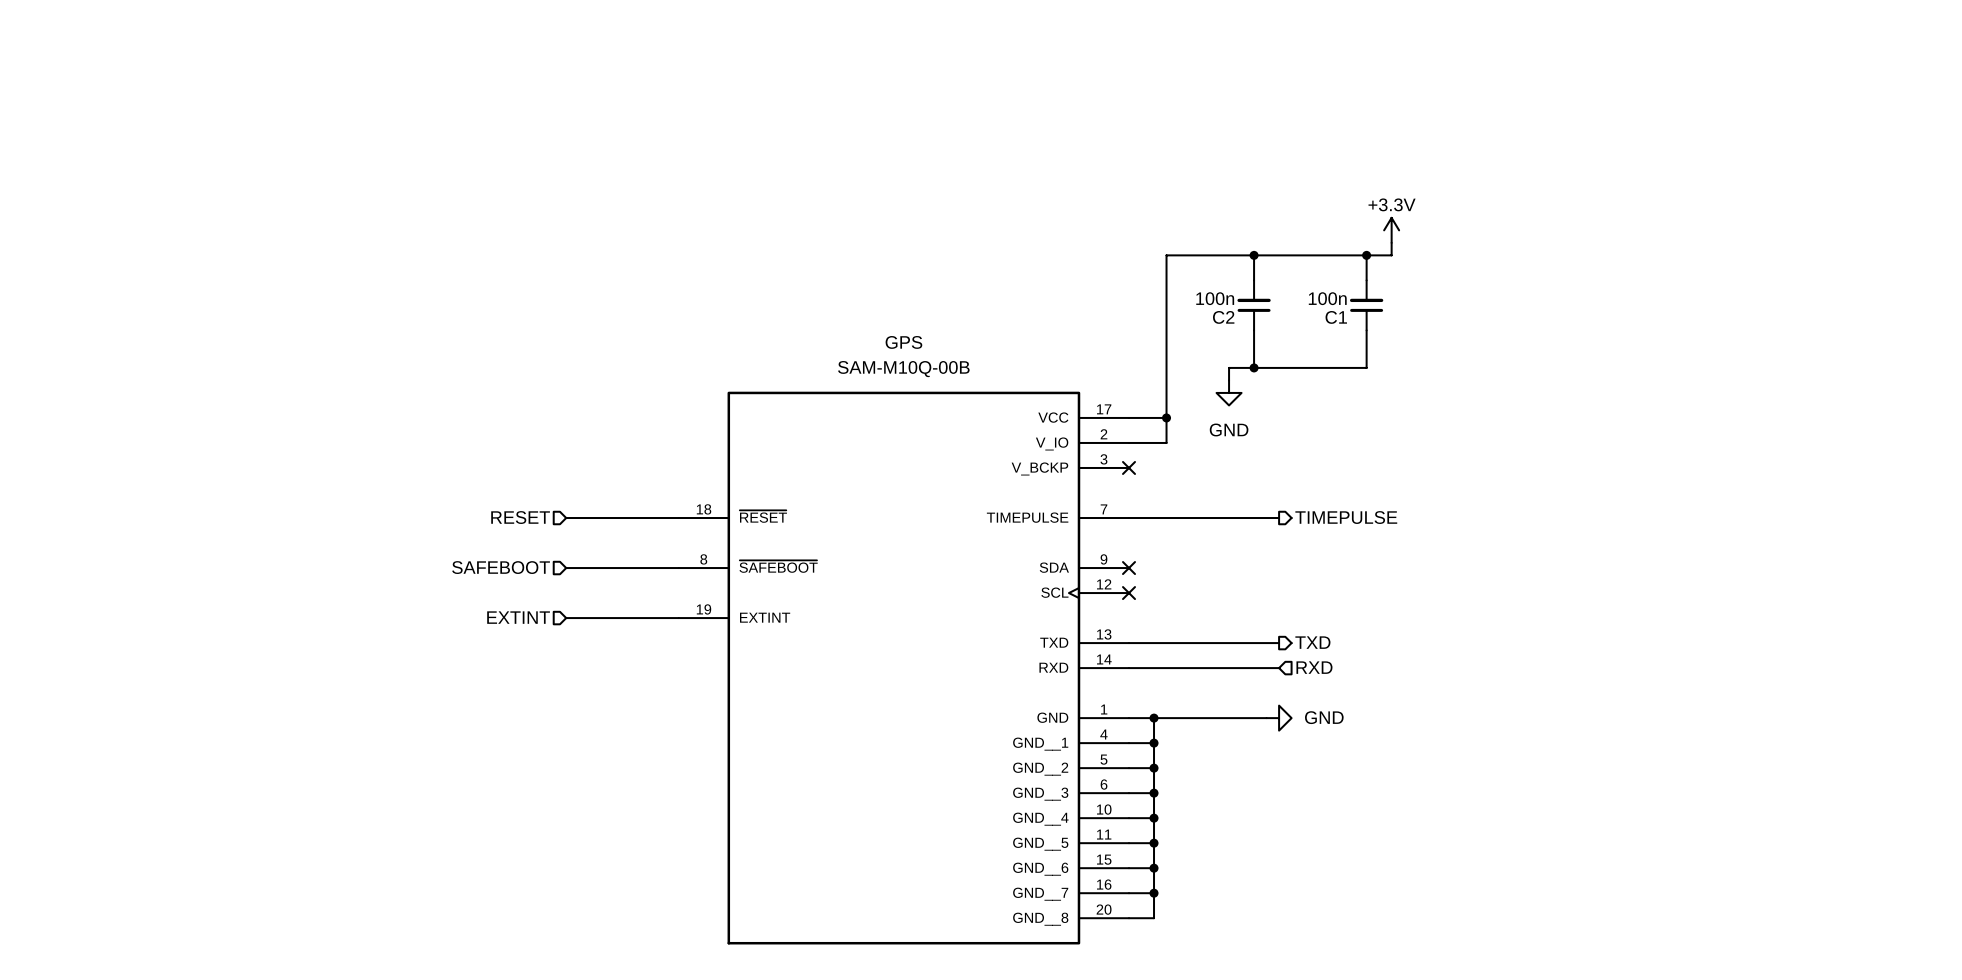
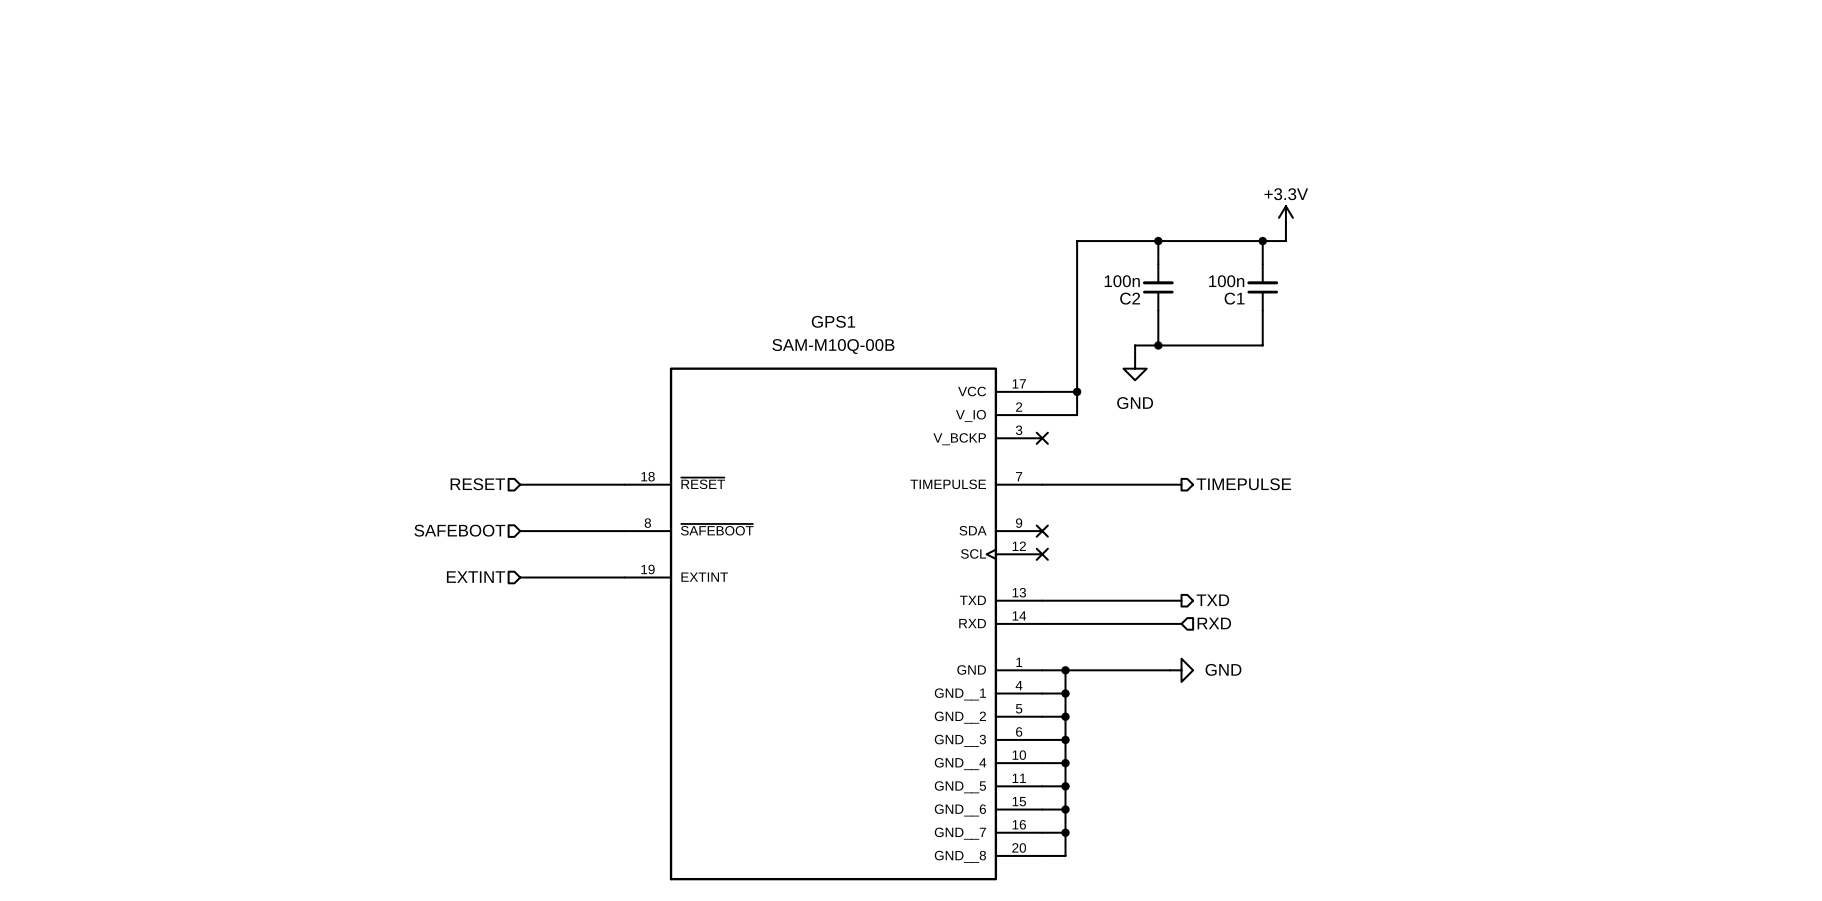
GPS name: GPS (903, 342) -> GPS1 (833, 321)

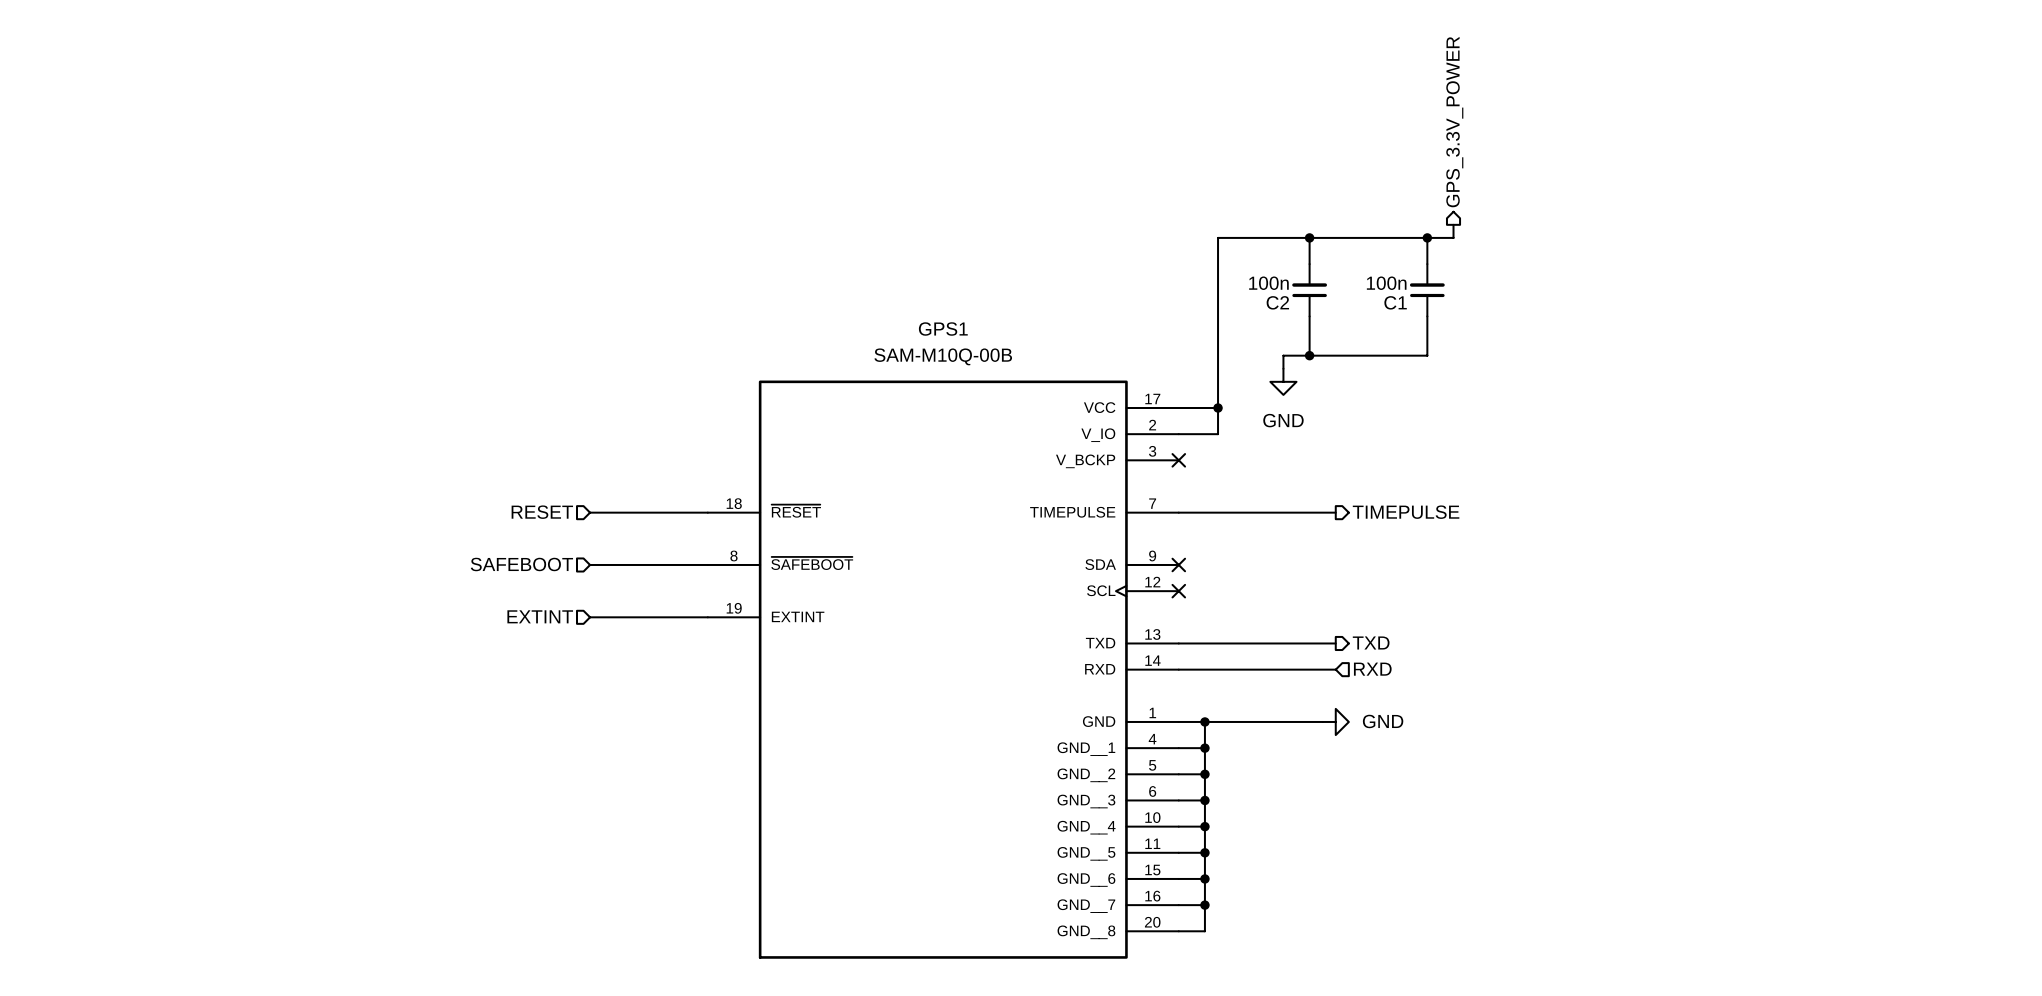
hierarchical label: none -> GPS_3.3V_POWER (1454, 122)
power symbol: +3.3V (1285, 217) -> none

